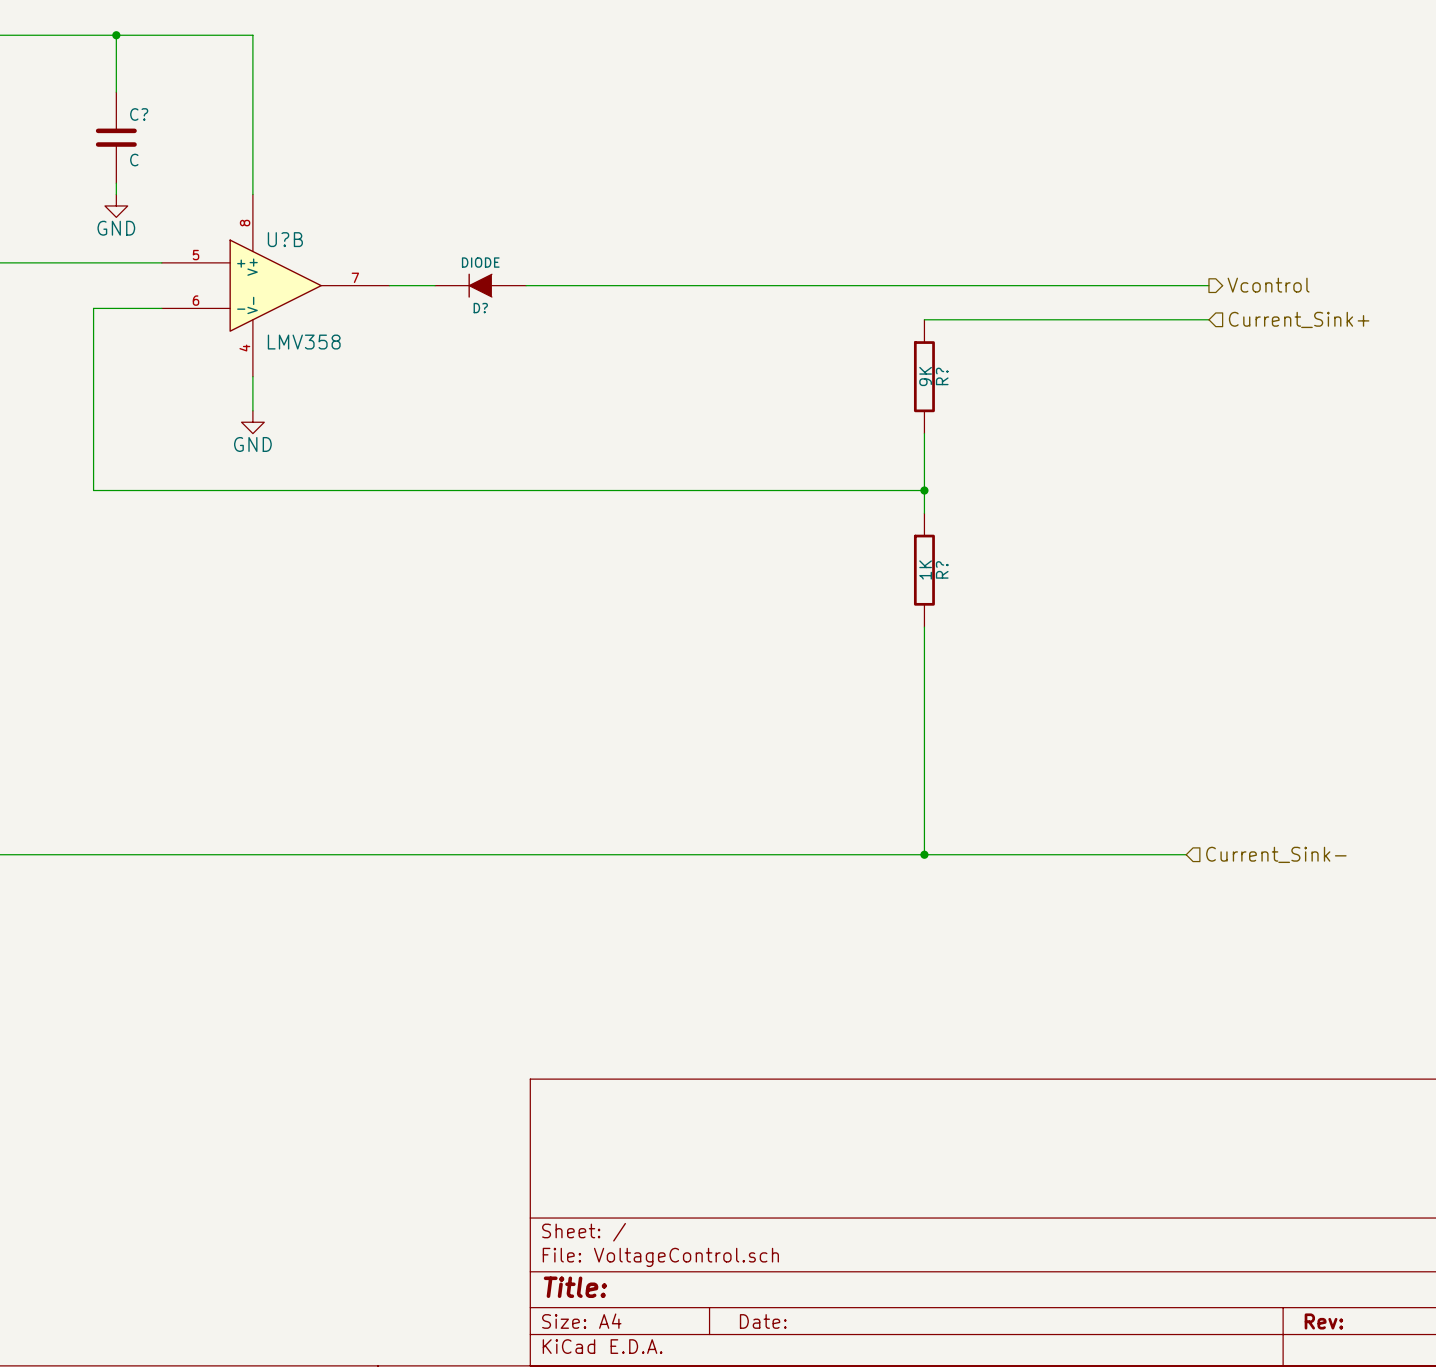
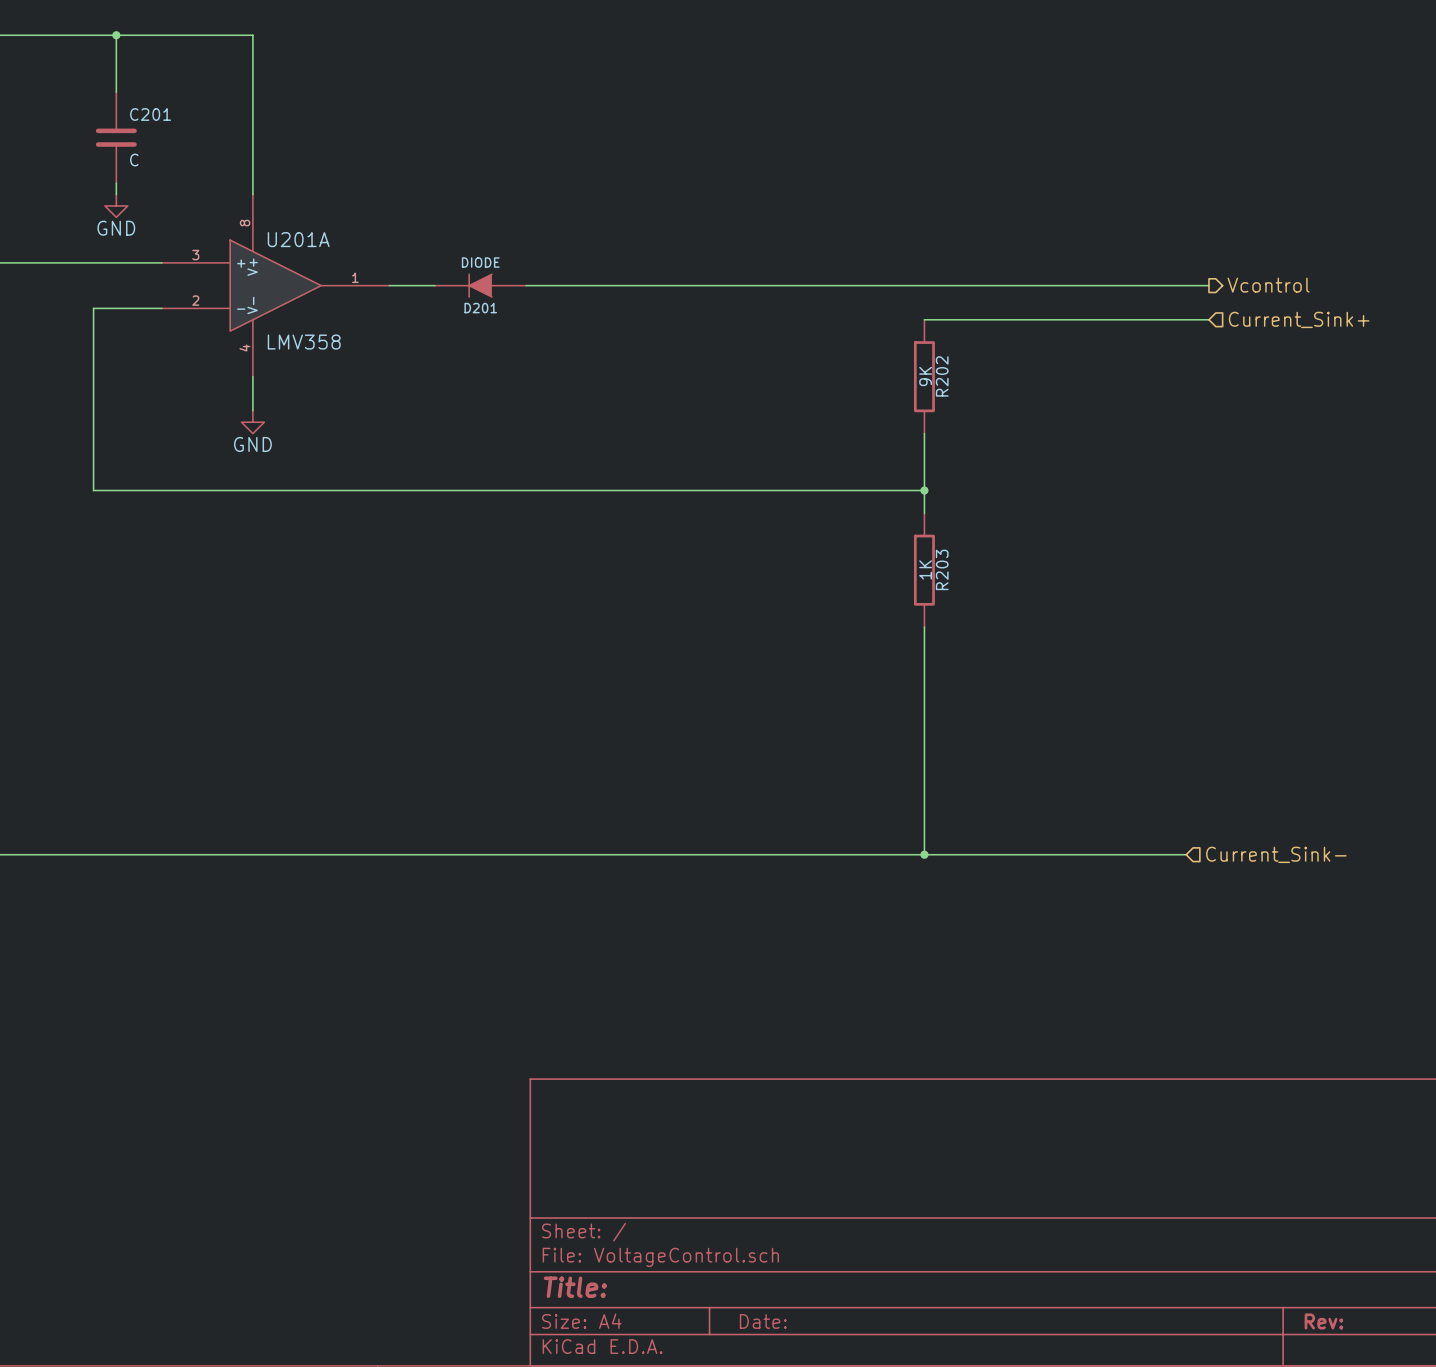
C? name: C? (139, 114) -> C201 (150, 114)
U?B name: U?B (285, 239) -> U201A (298, 239)
U?B pin number: 5 (196, 255) -> 3 (195, 255)
U?B pin number: 7 (355, 277) -> 1 (355, 277)
U?B pin number: 6 (196, 300) -> 2 (195, 300)
D? name: D? (480, 308) -> D201 (480, 308)
R? name: R? (942, 376) -> R202 (942, 376)
R? name: R? (942, 569) -> R203 (942, 569)

